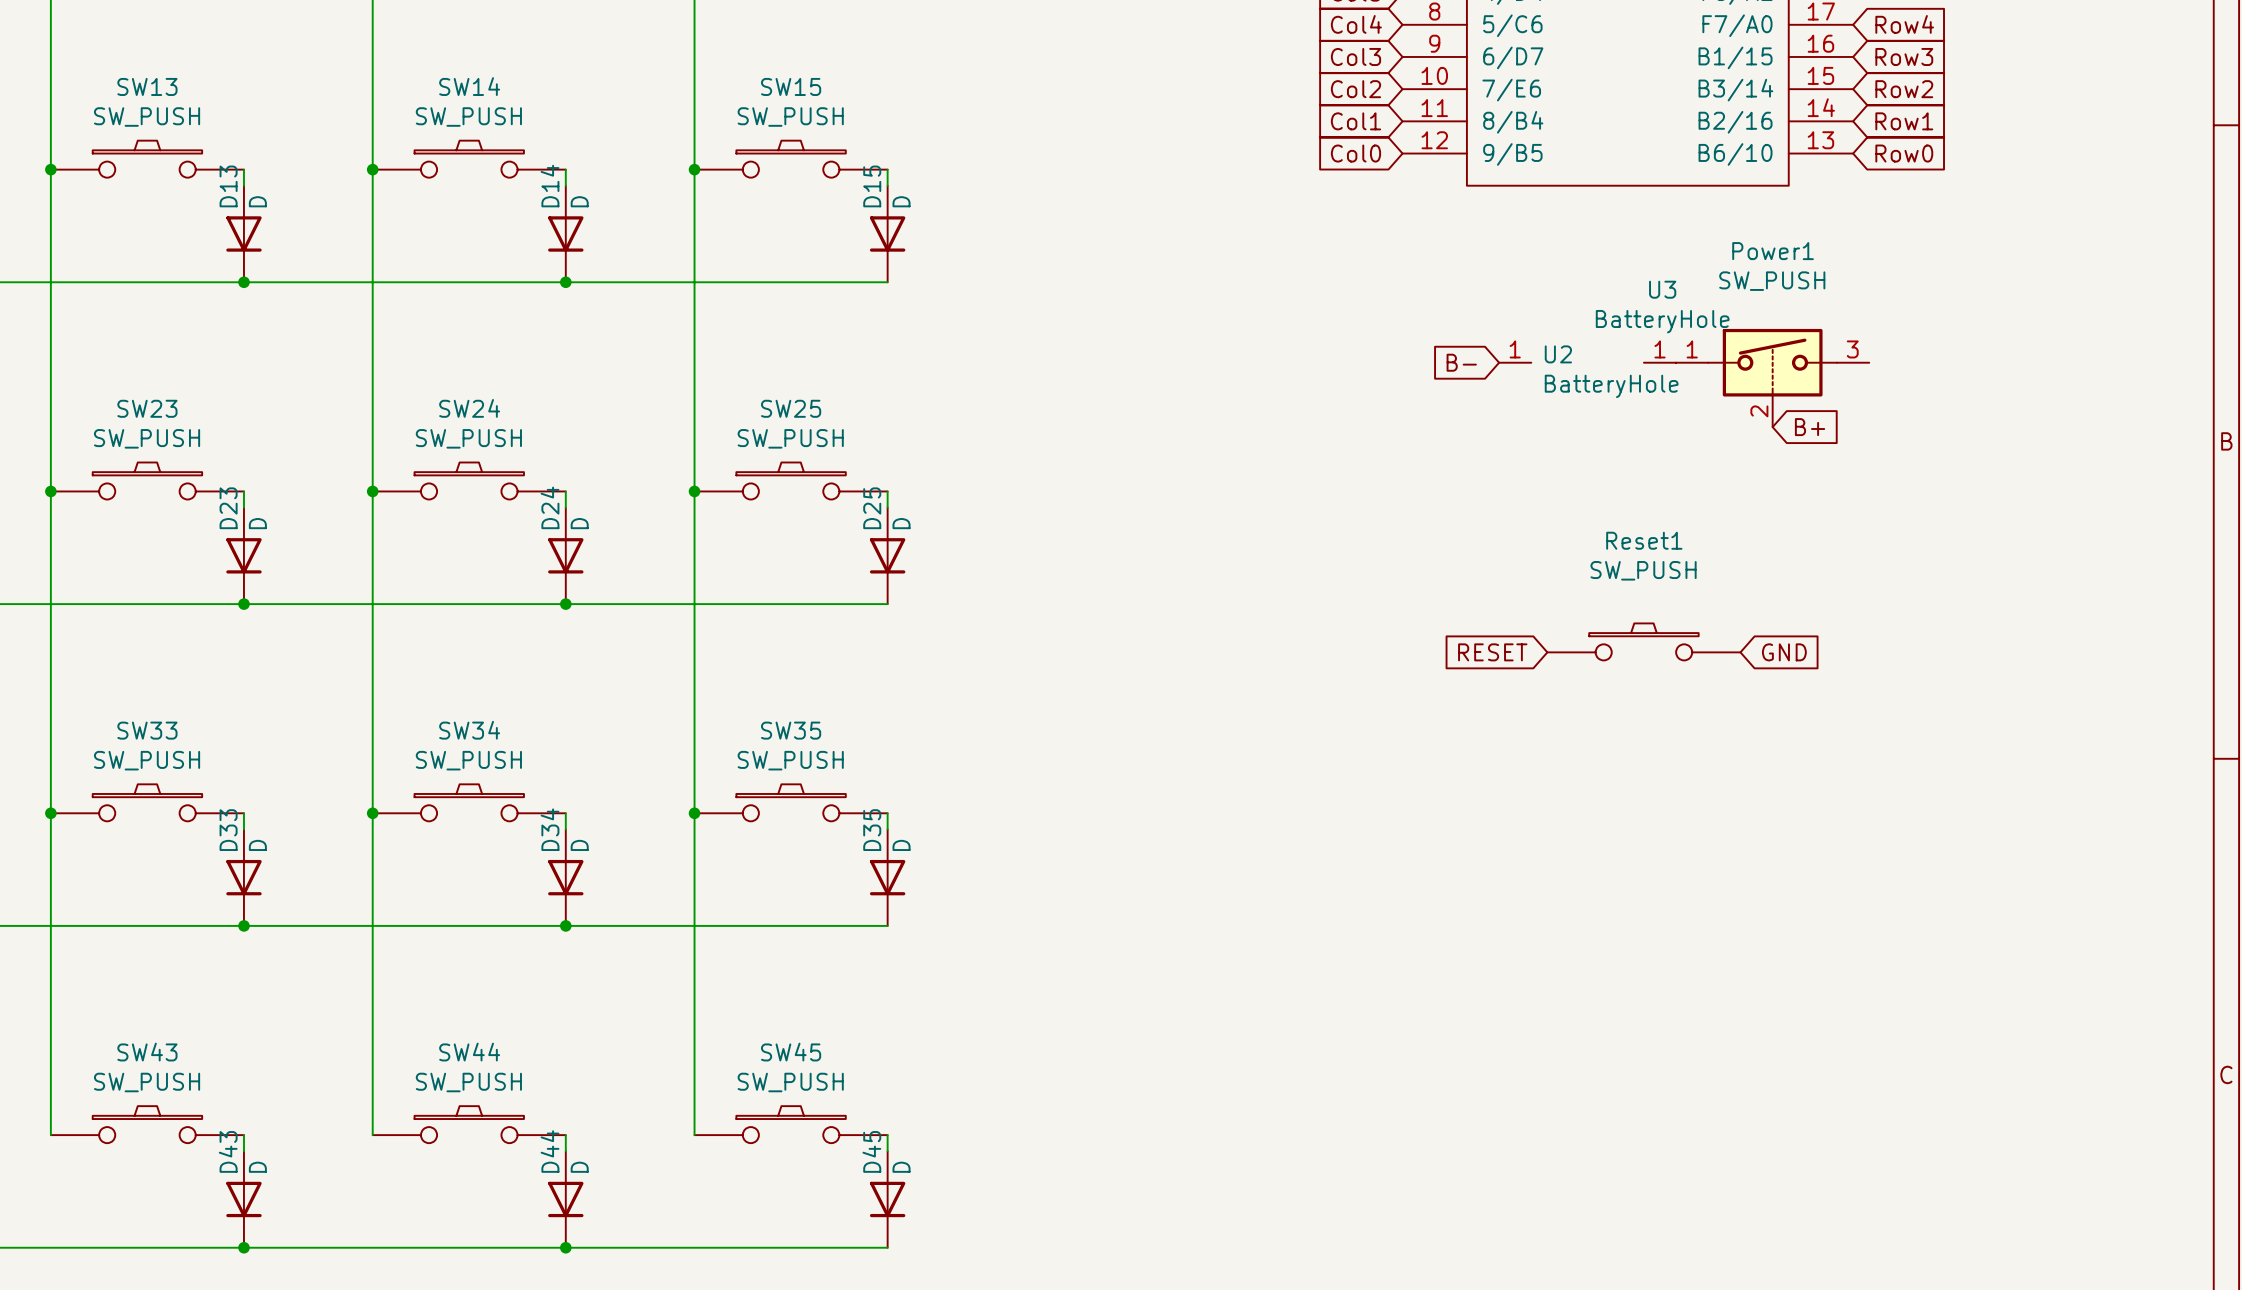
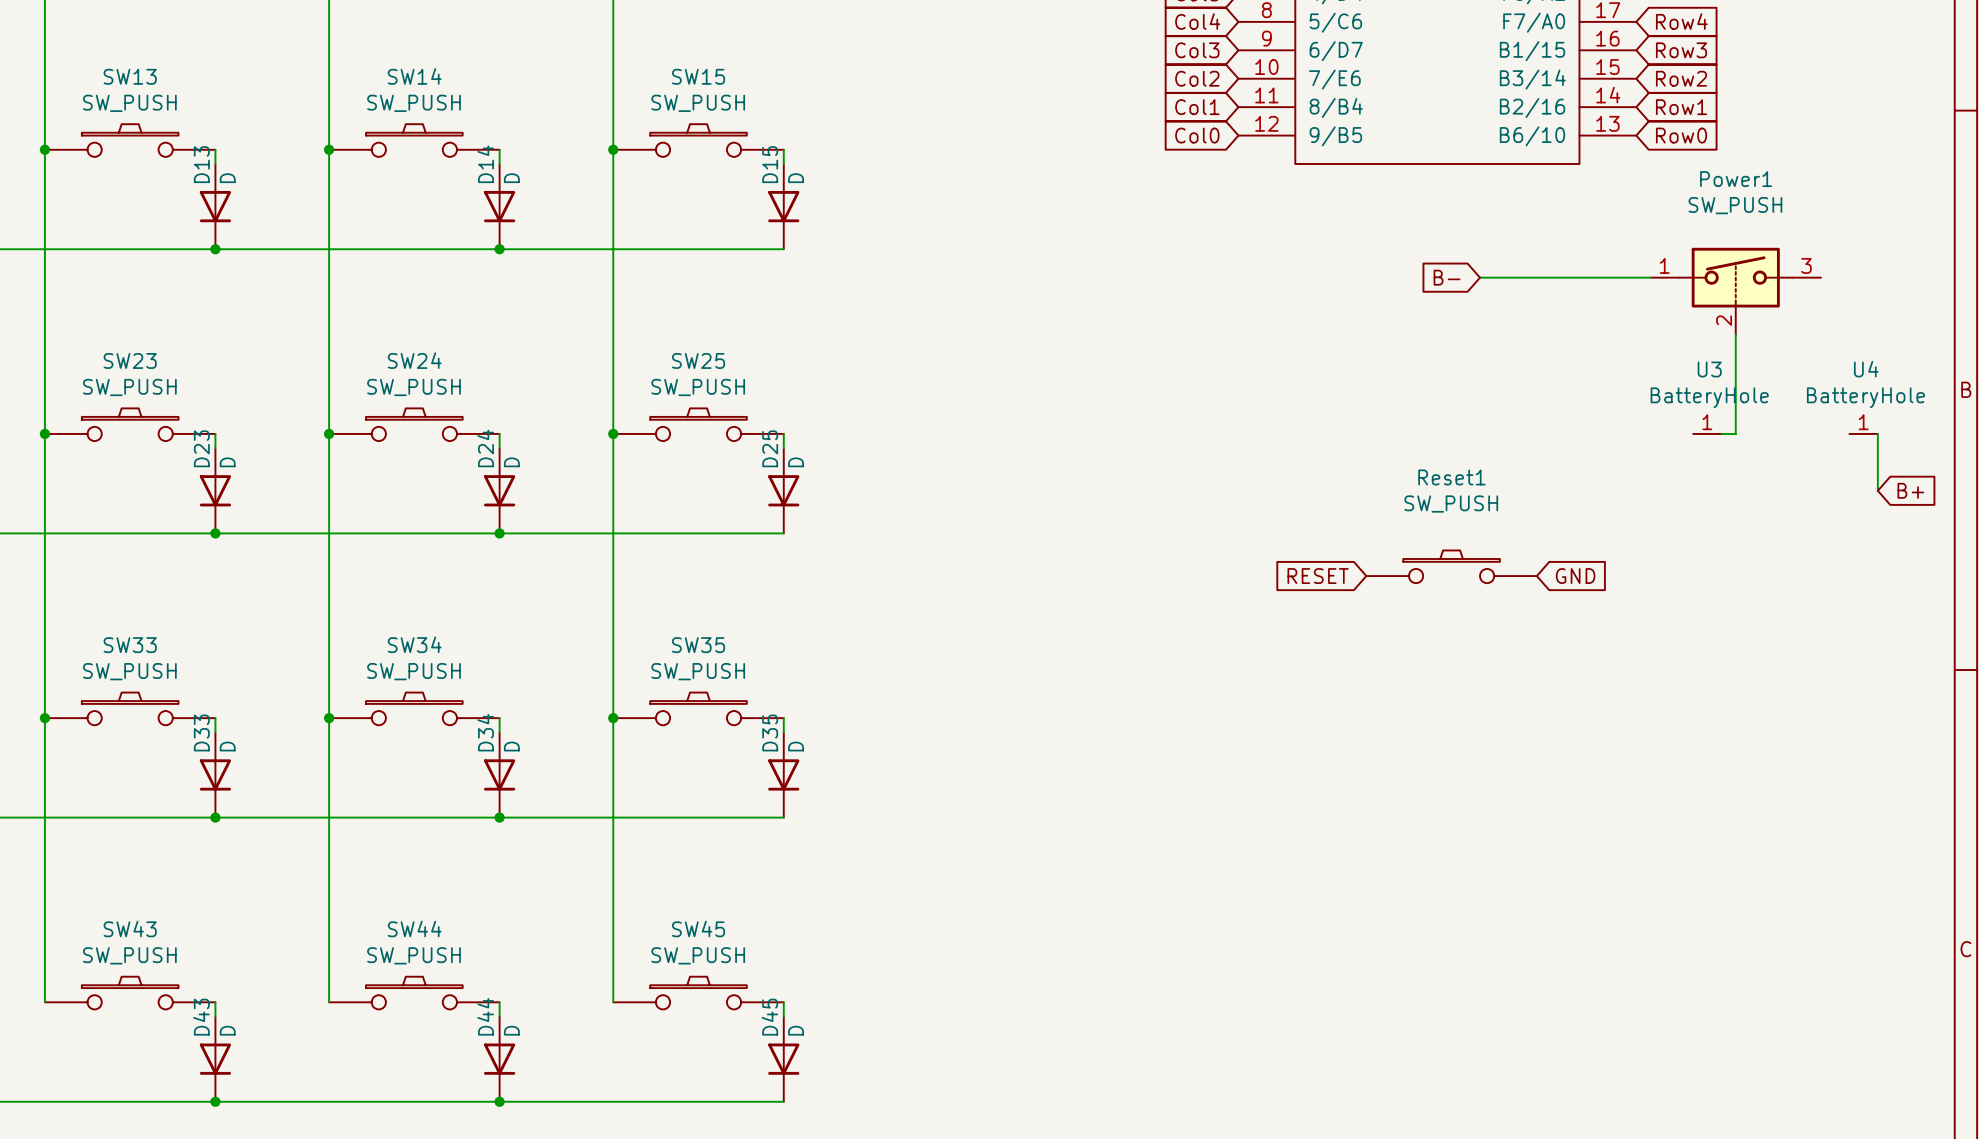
wire: none -> (1480, 277) (1650, 277)
global label position: B- (1461, 362) -> B- (1447, 277)
U2: BatteryHole (1515, 362) -> none
U3 position: (1660, 362) -> (1707, 433)
Power1 position: (1772, 378) -> (1735, 291)
wire: none -> (1735, 334) (1735, 433) (1721, 433)
global label: B+ (1810, 427) -> none
U4: none -> BatteryHole (1863, 433)
wire: none -> (1877, 433) (1877, 490)
global label: none -> B+ (1910, 490)

